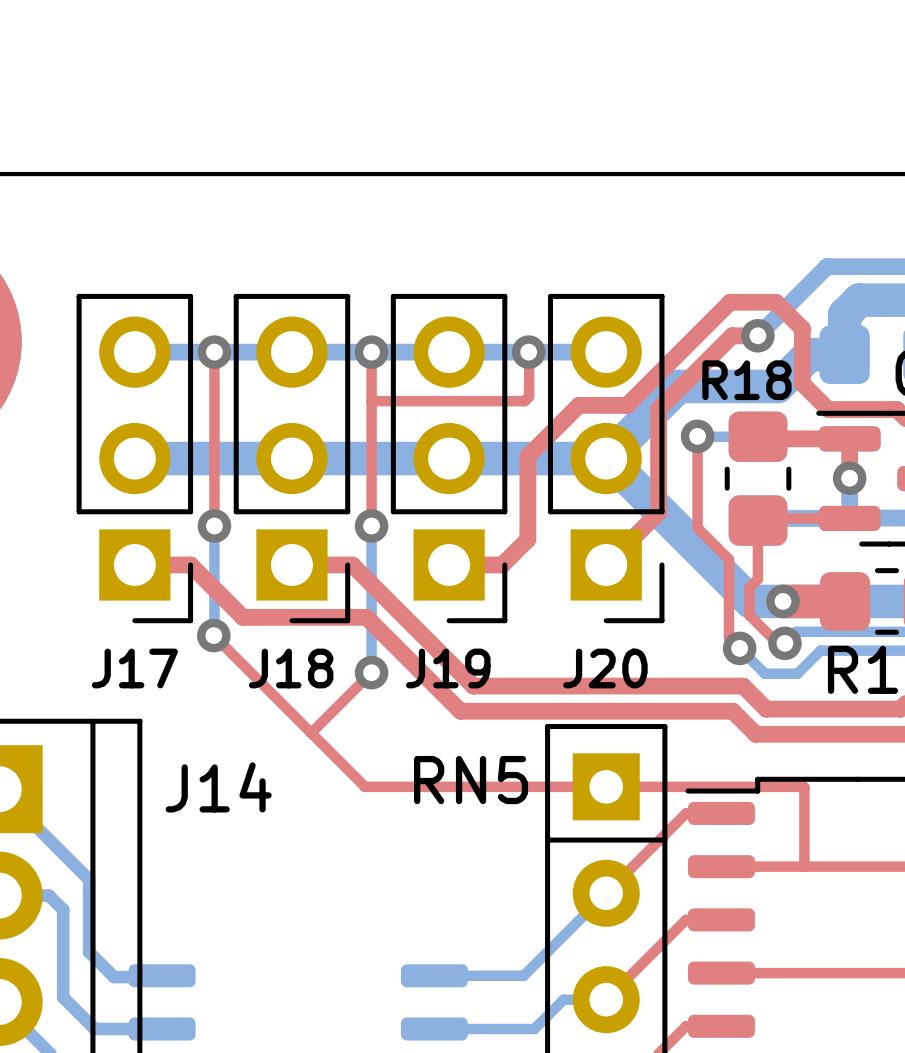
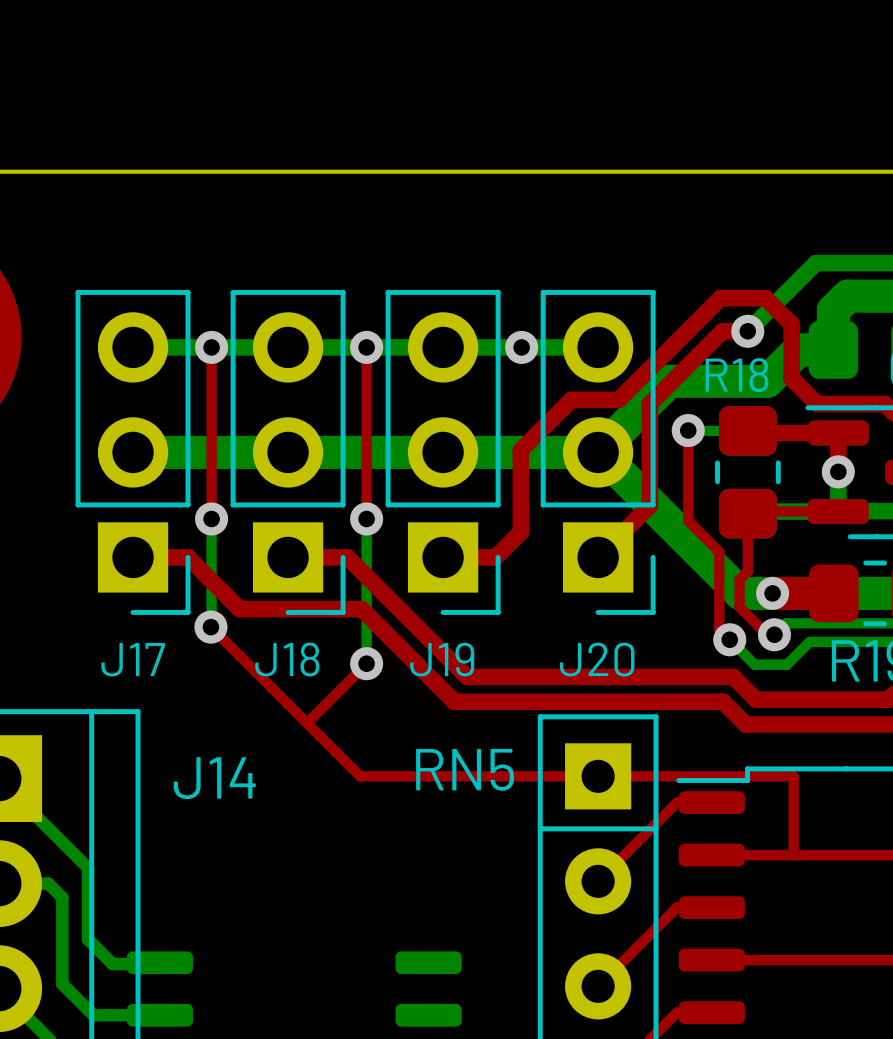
top track: (529, 352) (529, 396) (524, 401) (371, 401) -> none
bottom track: (606, 893) (523, 975) (434, 975) -> none
bottom track: (606, 999) (563, 999) (534, 1028) (434, 1028) -> none

